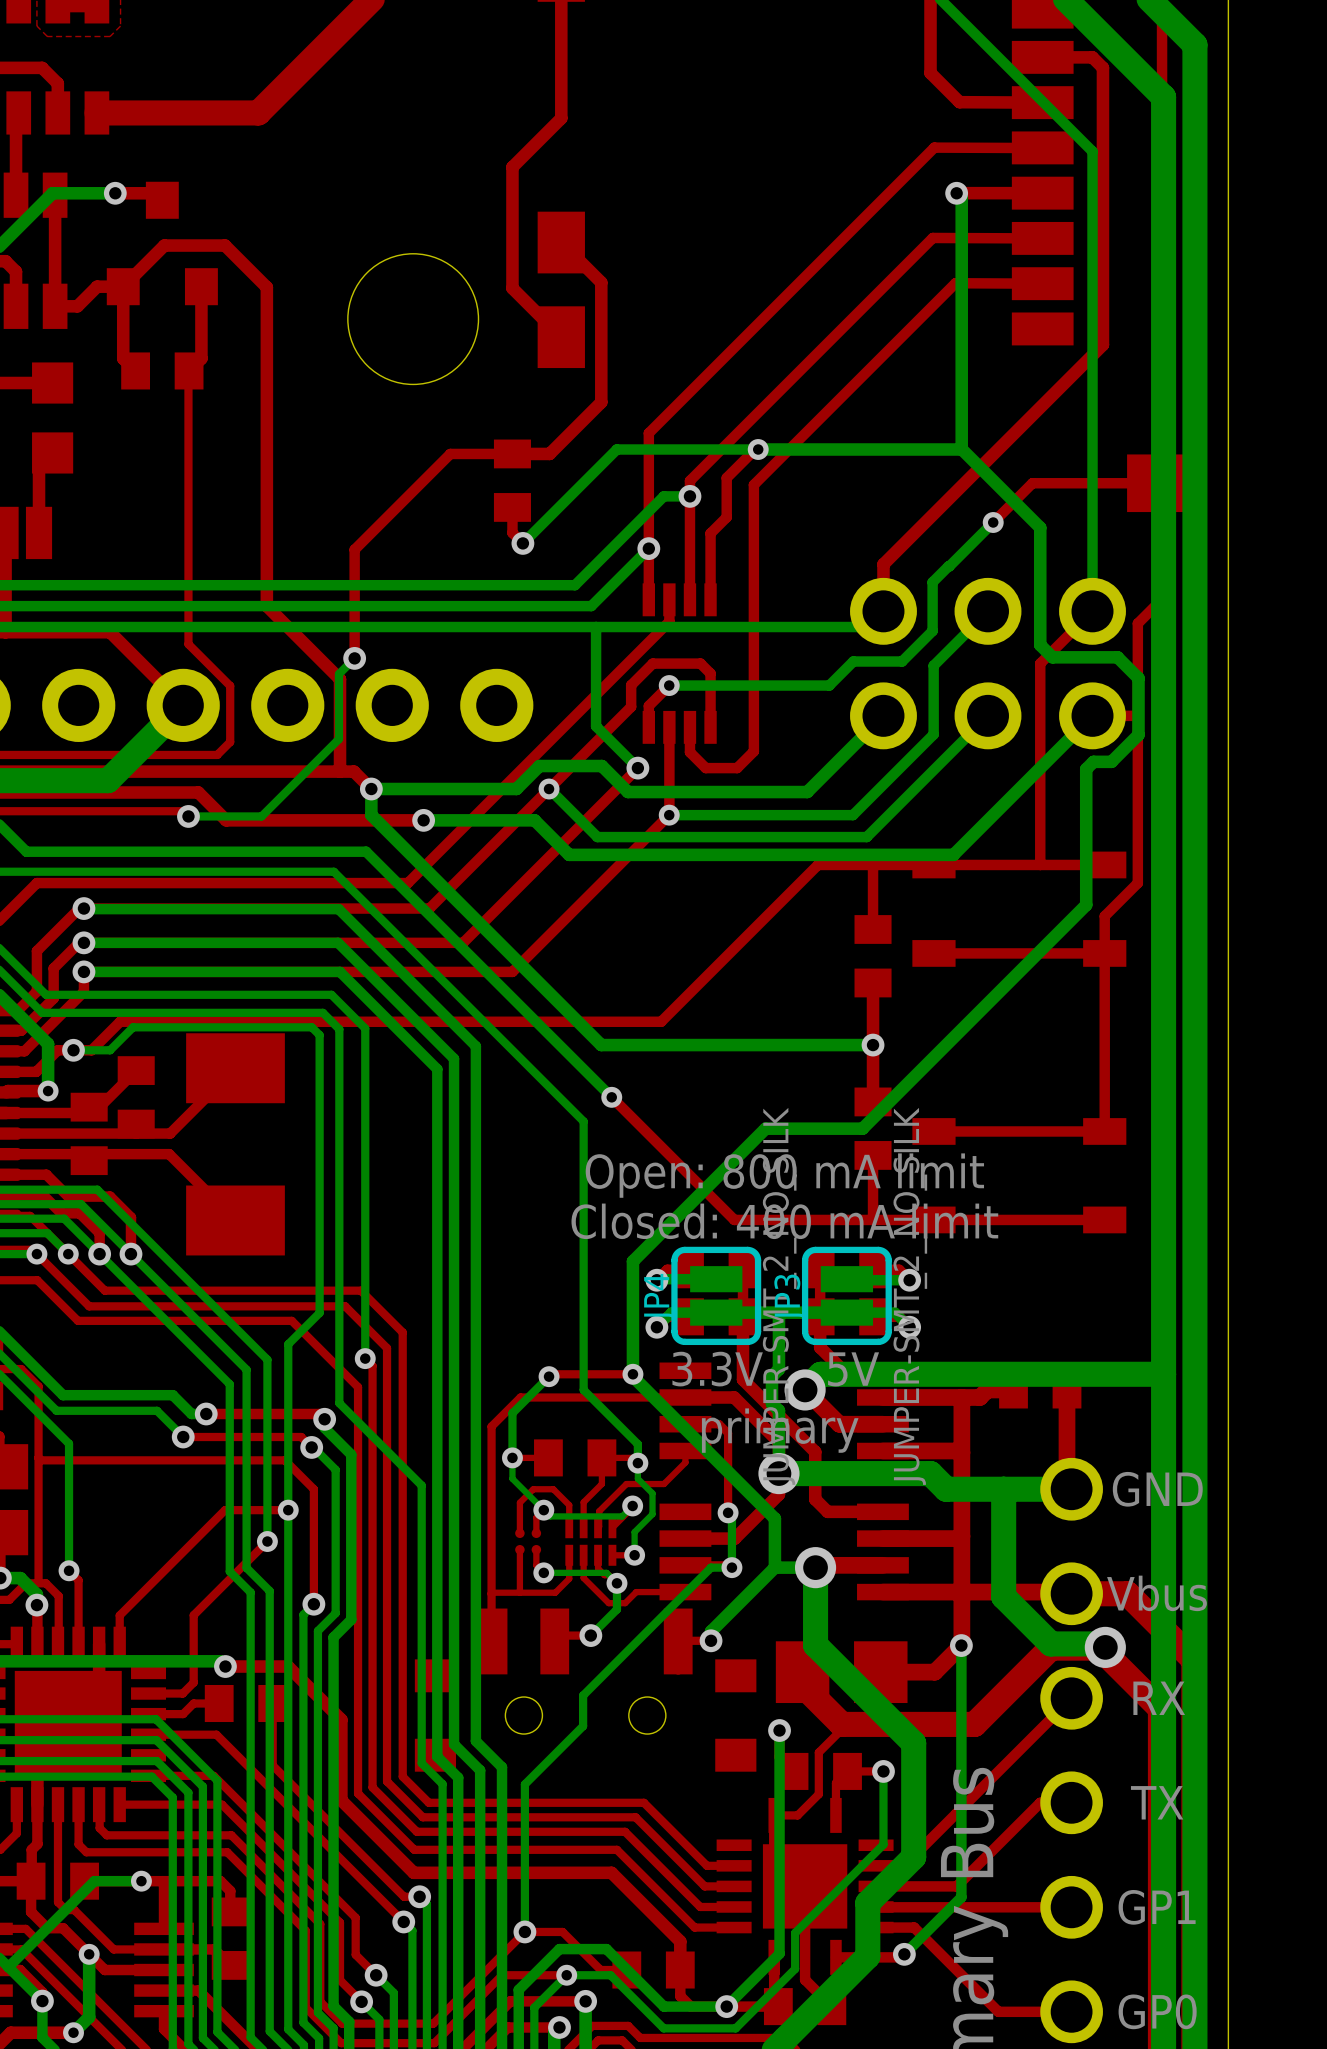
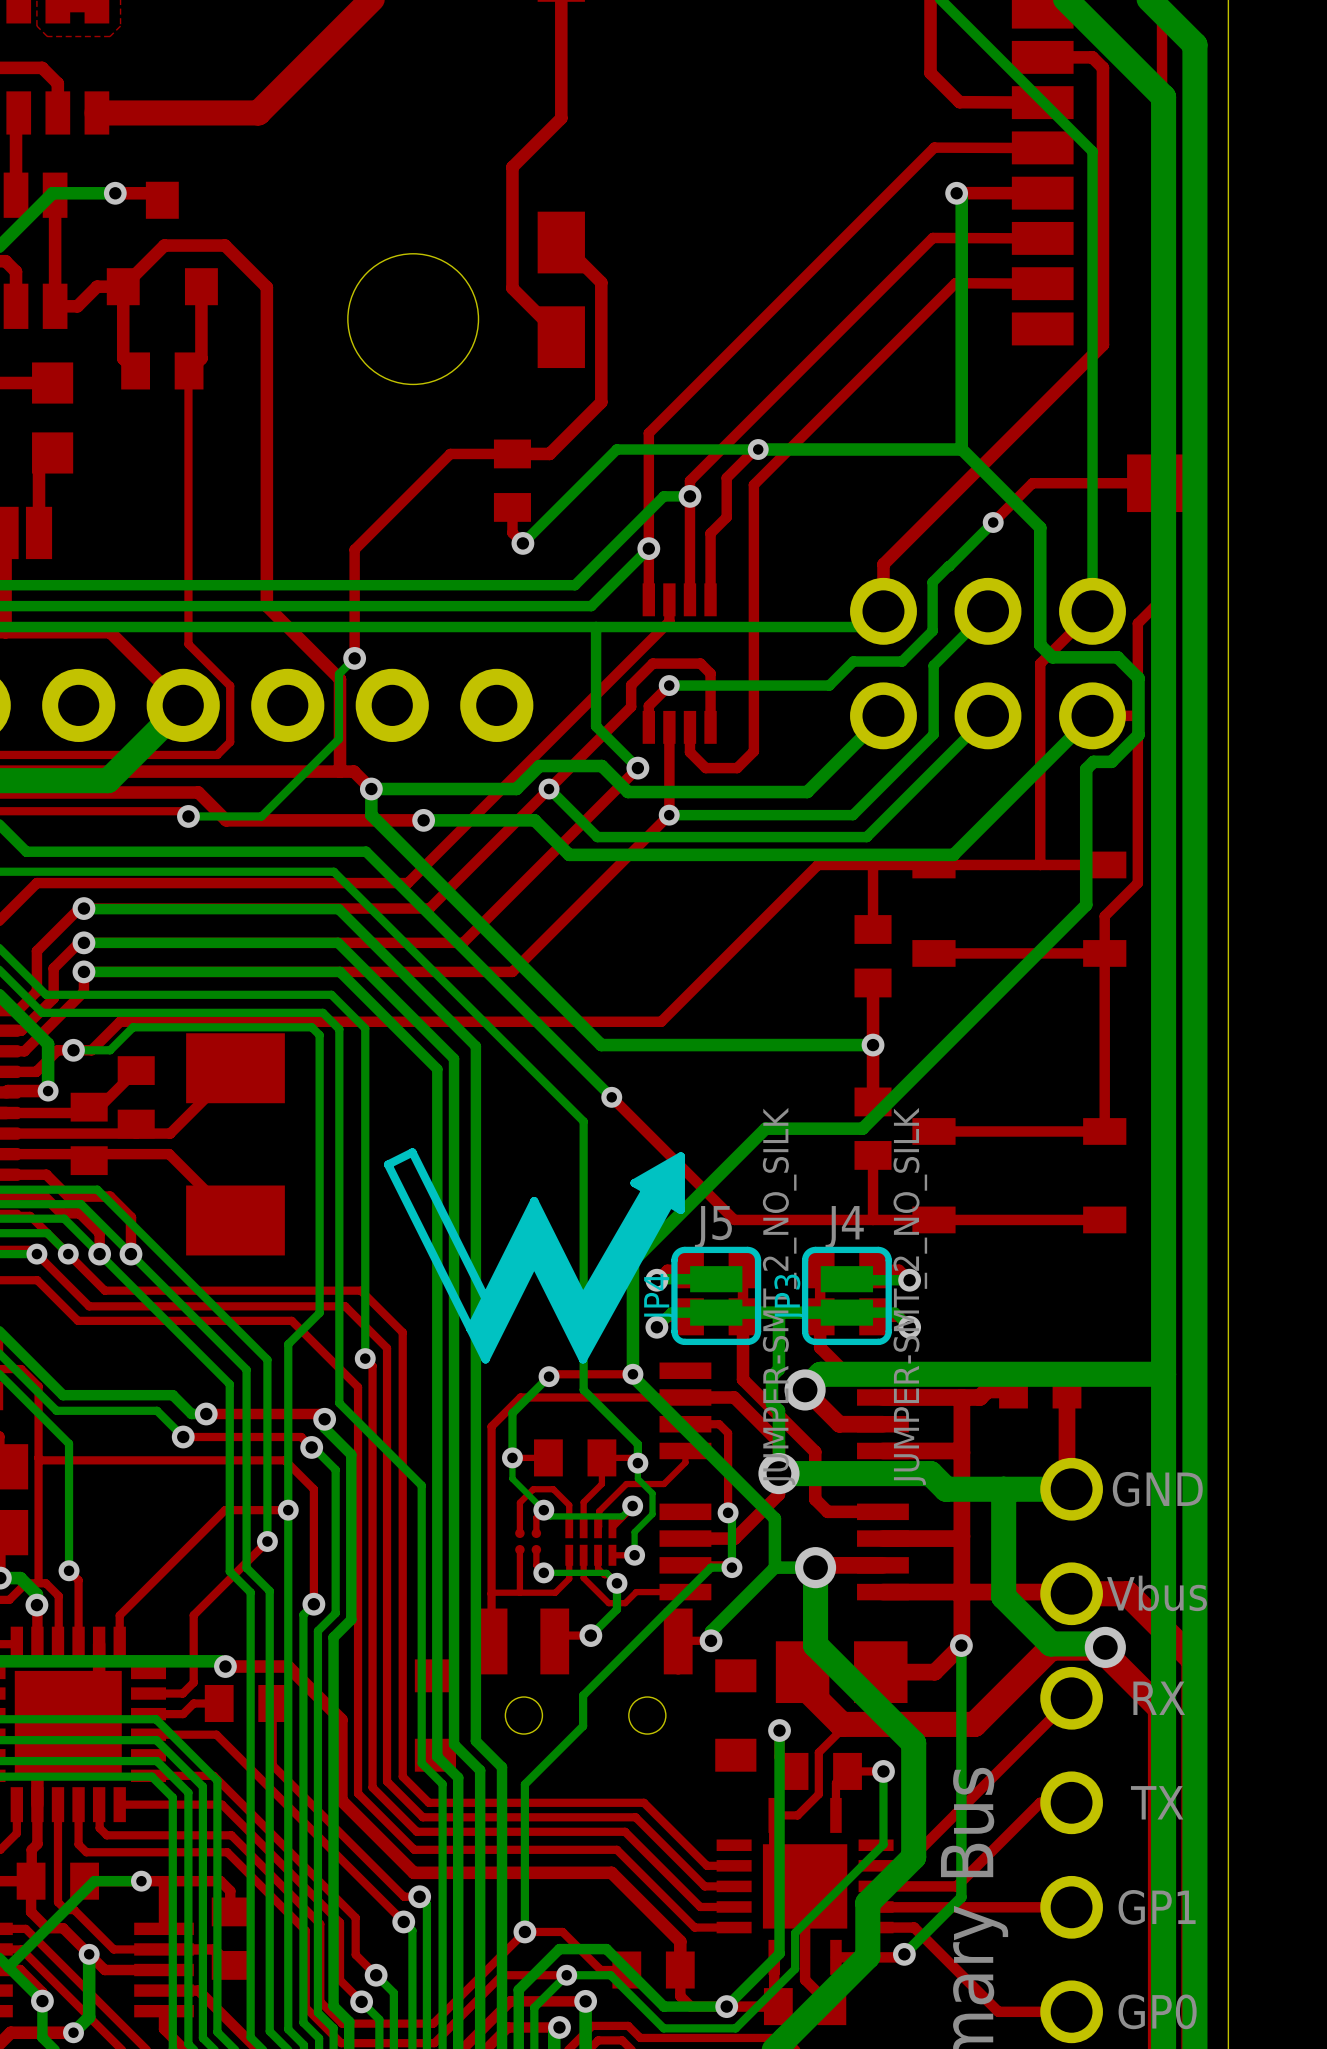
drawing: none -> [384, 1148, 686, 1364]
text: Open: 800 mA limit (784, 1175) -> none
text: Closed: 400 mA limit (784, 1221) -> none
text: none -> J5 (713, 1227)
text: none -> J4 (844, 1227)
text: 3.3V (717, 1369) -> none
text: 5V (853, 1369) -> none
text: primary (780, 1430) -> none

